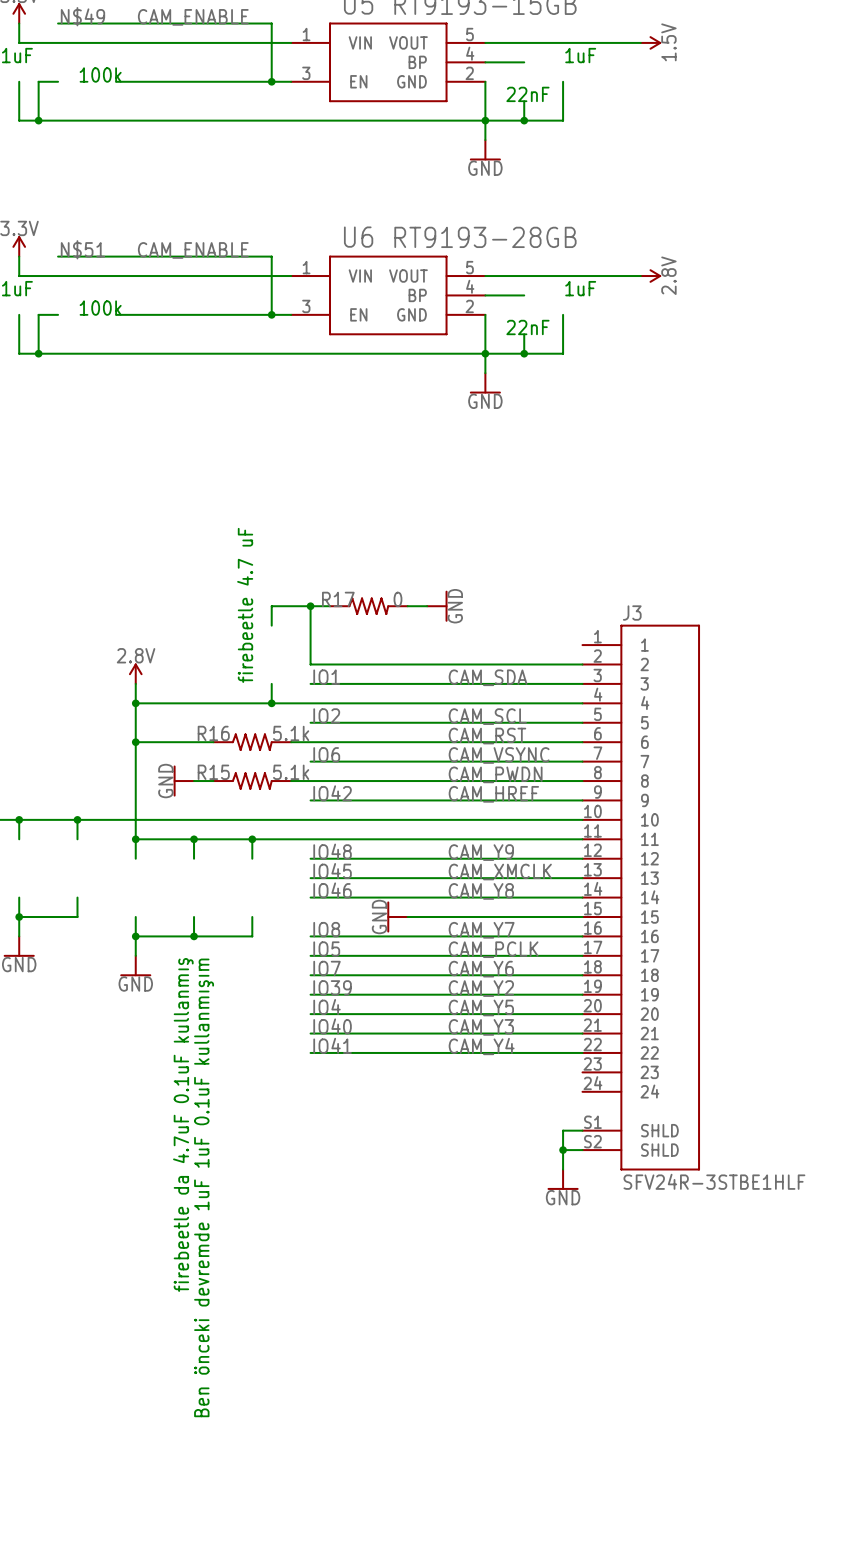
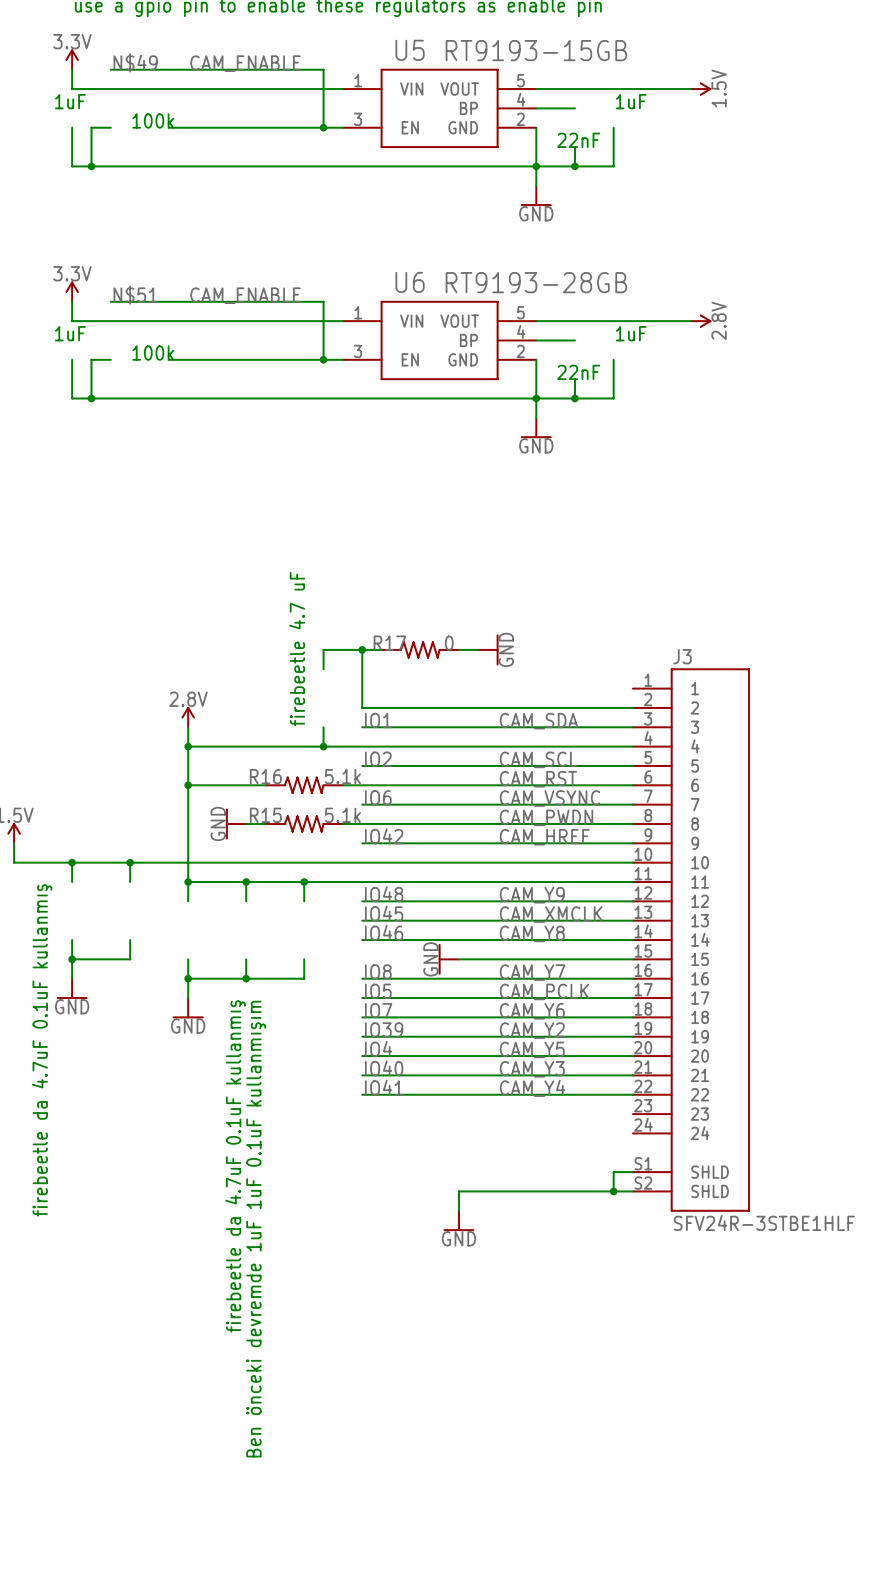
wire: (563, 1150) (563, 1169) -> (613, 1191) (458, 1191) (458, 1210)
power symbol position: GND (563, 1179) -> GND (458, 1220)

